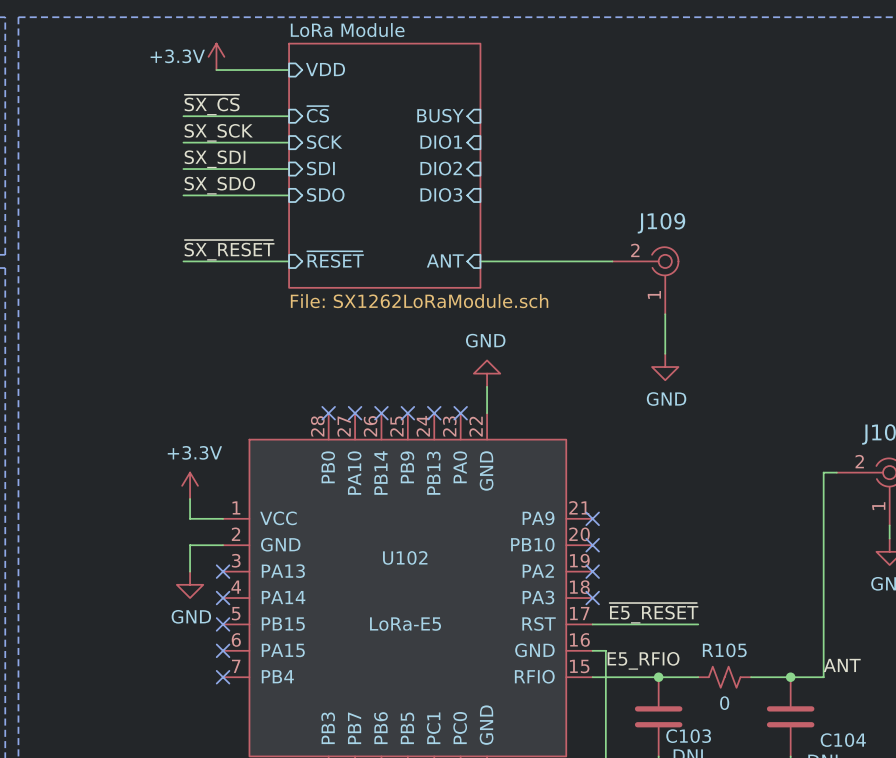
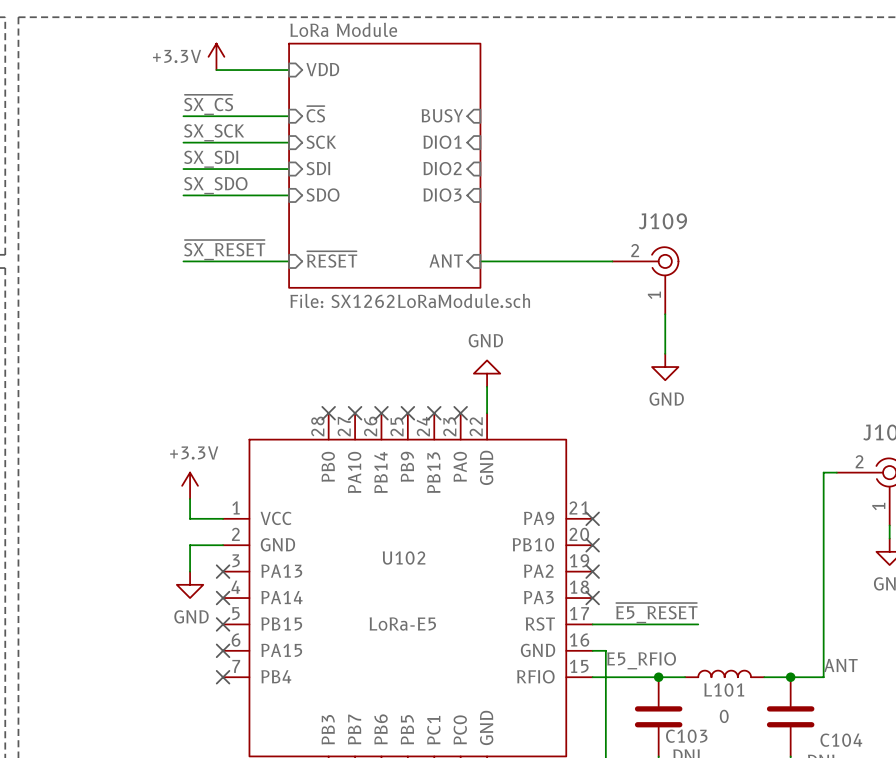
L101: none -> 0 (724, 673)
R105: 0 (724, 677) -> none

